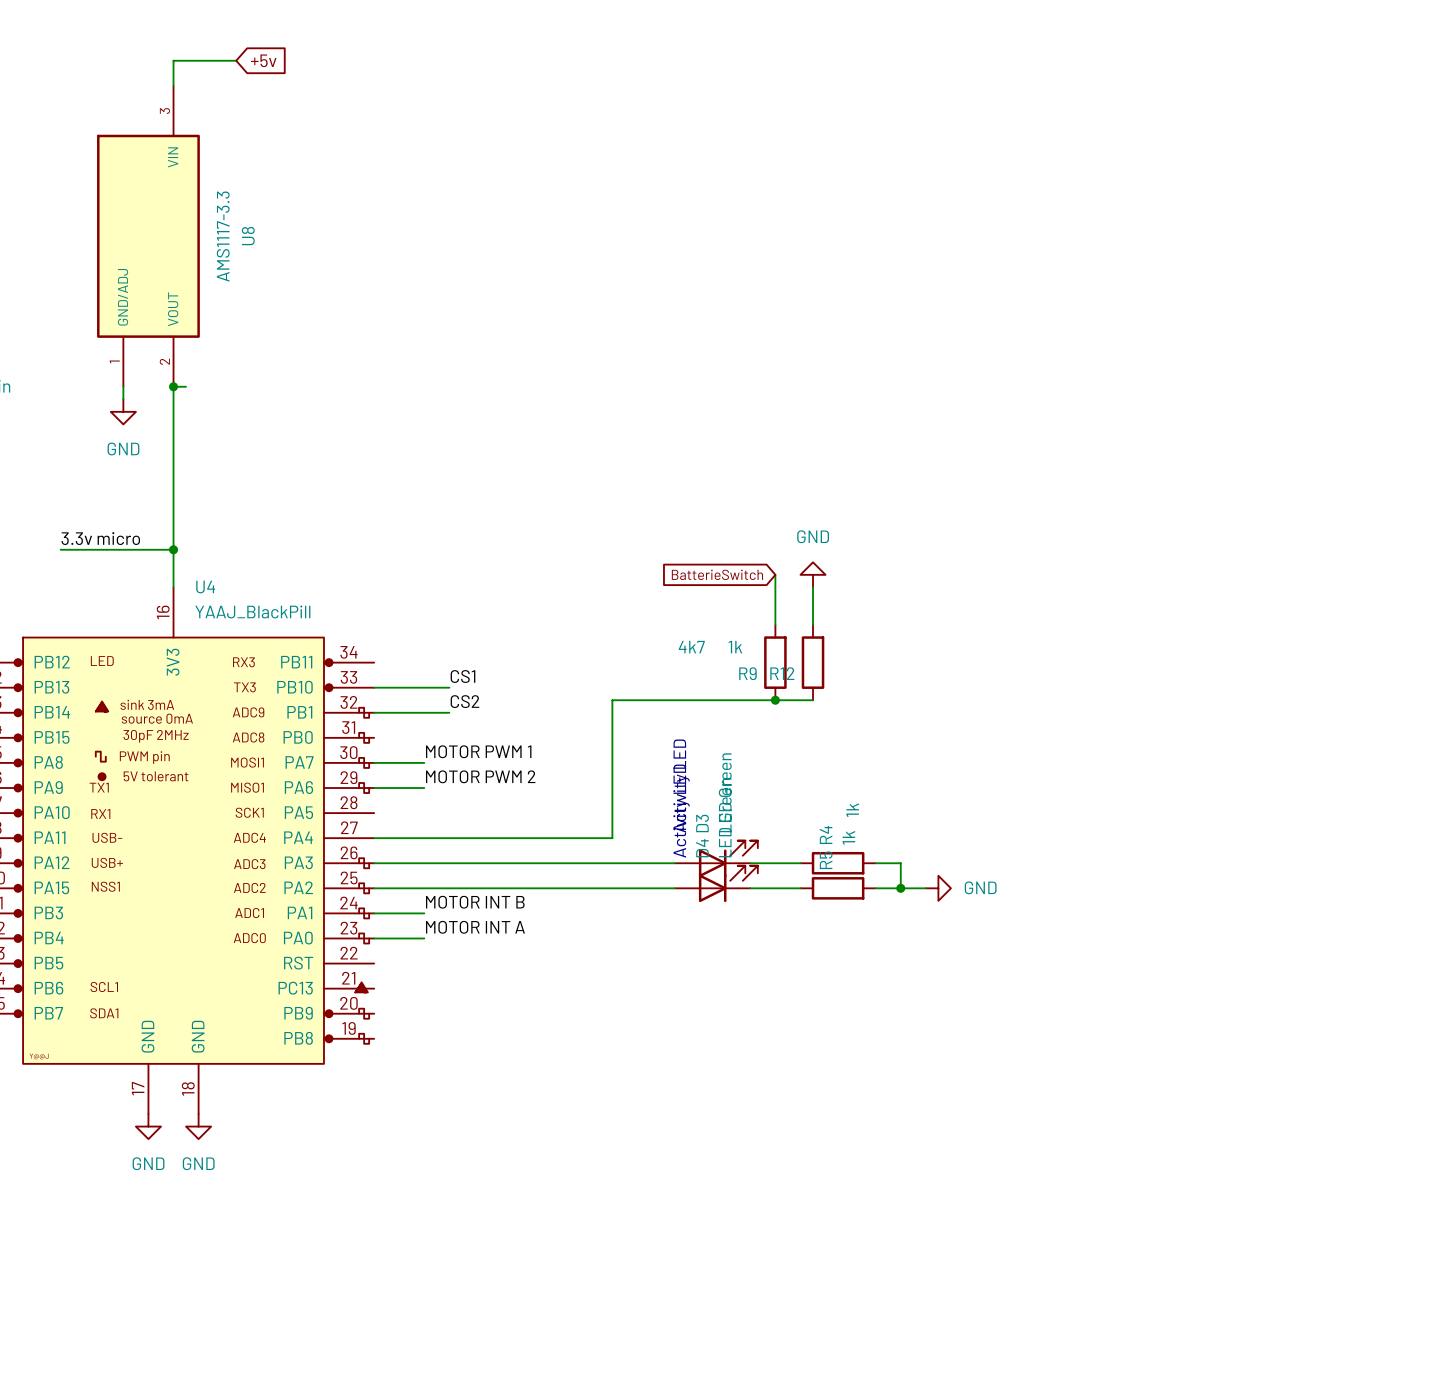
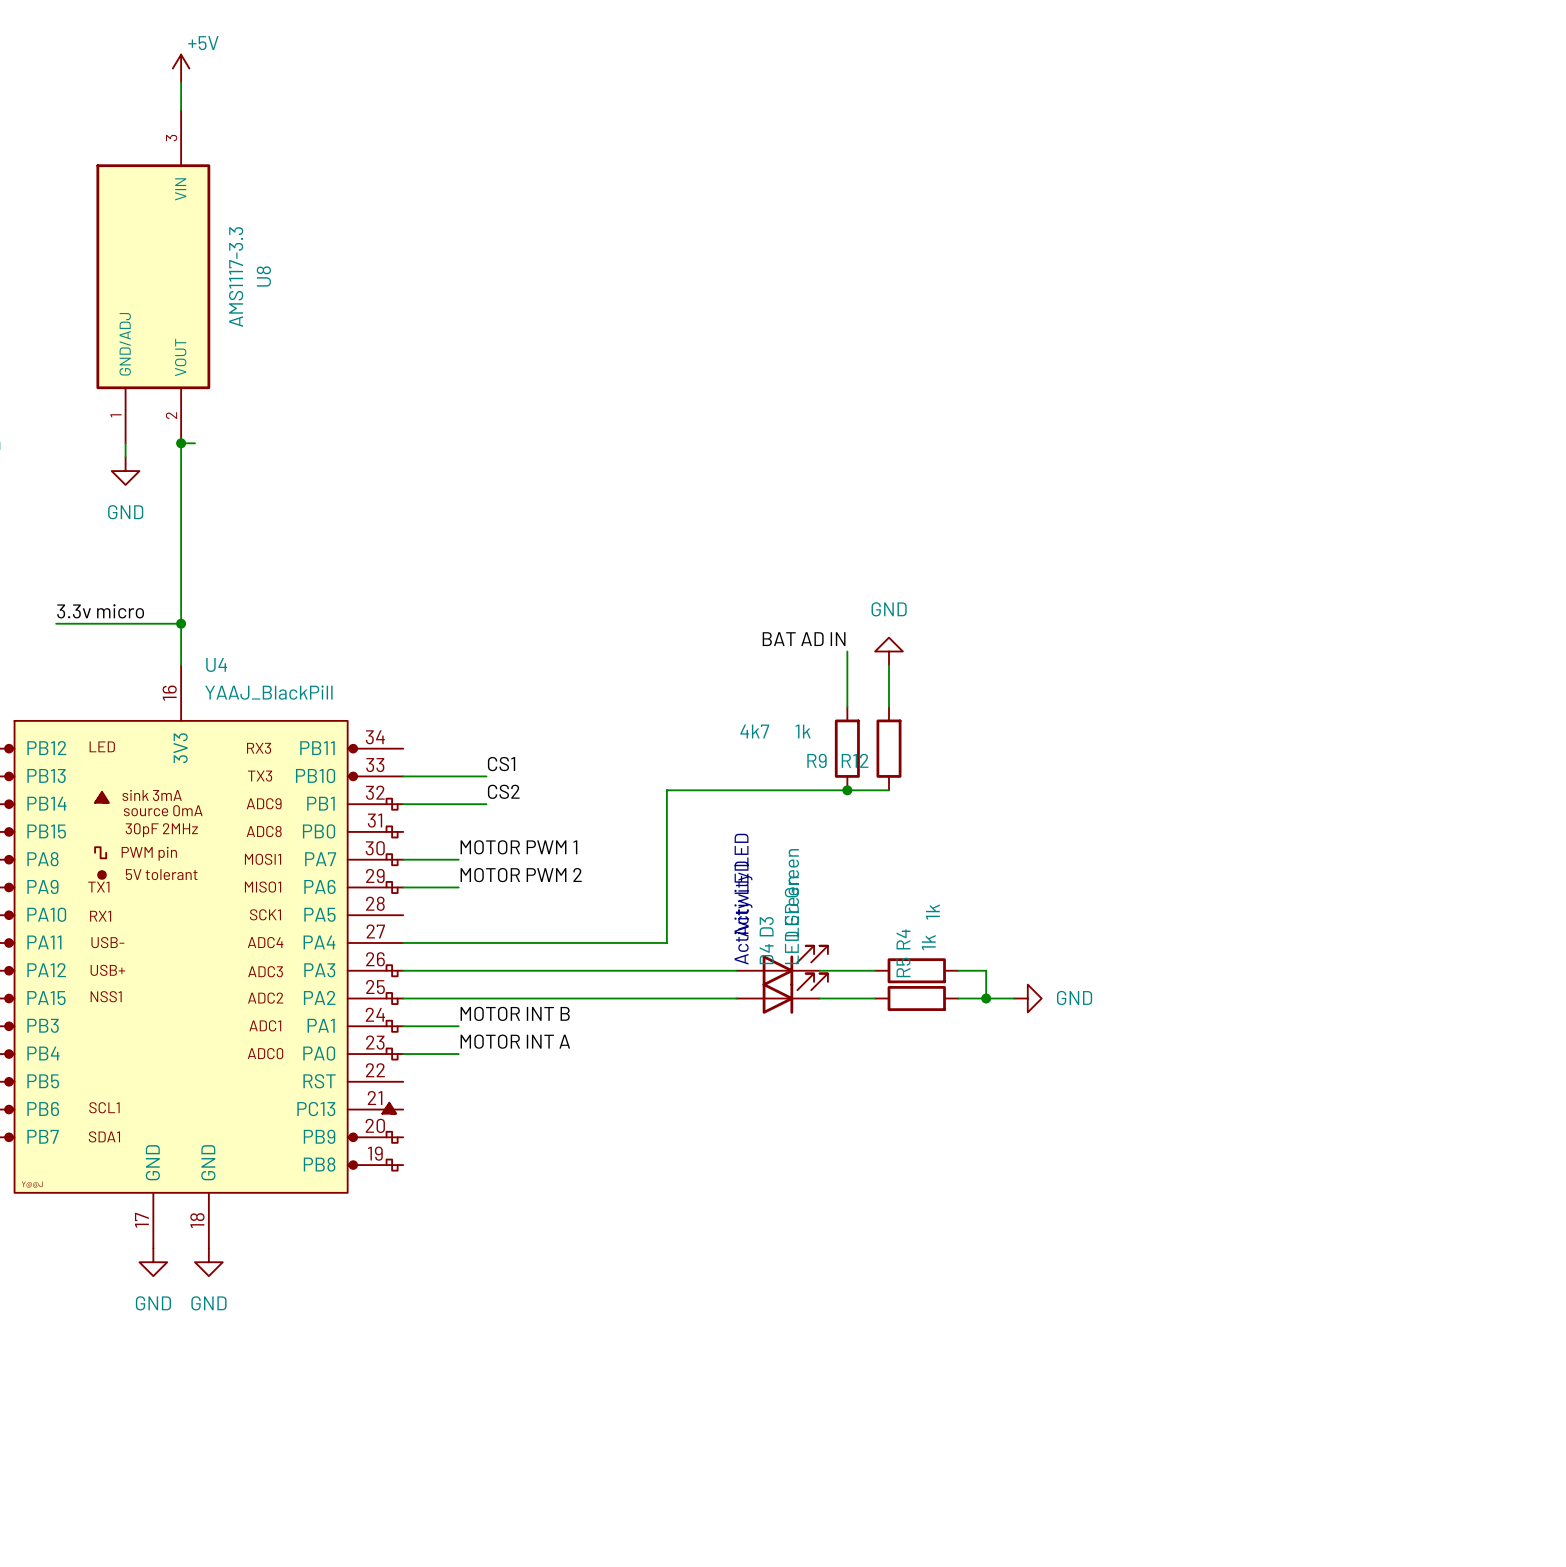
power symbol: none -> +5V (181, 68)
wire: (173, 60) (236, 60) -> none
global label: +5v (263, 60) -> none
label: none -> BAT AD IN (804, 639)
global label: BatterieSwitch (717, 574) -> none

